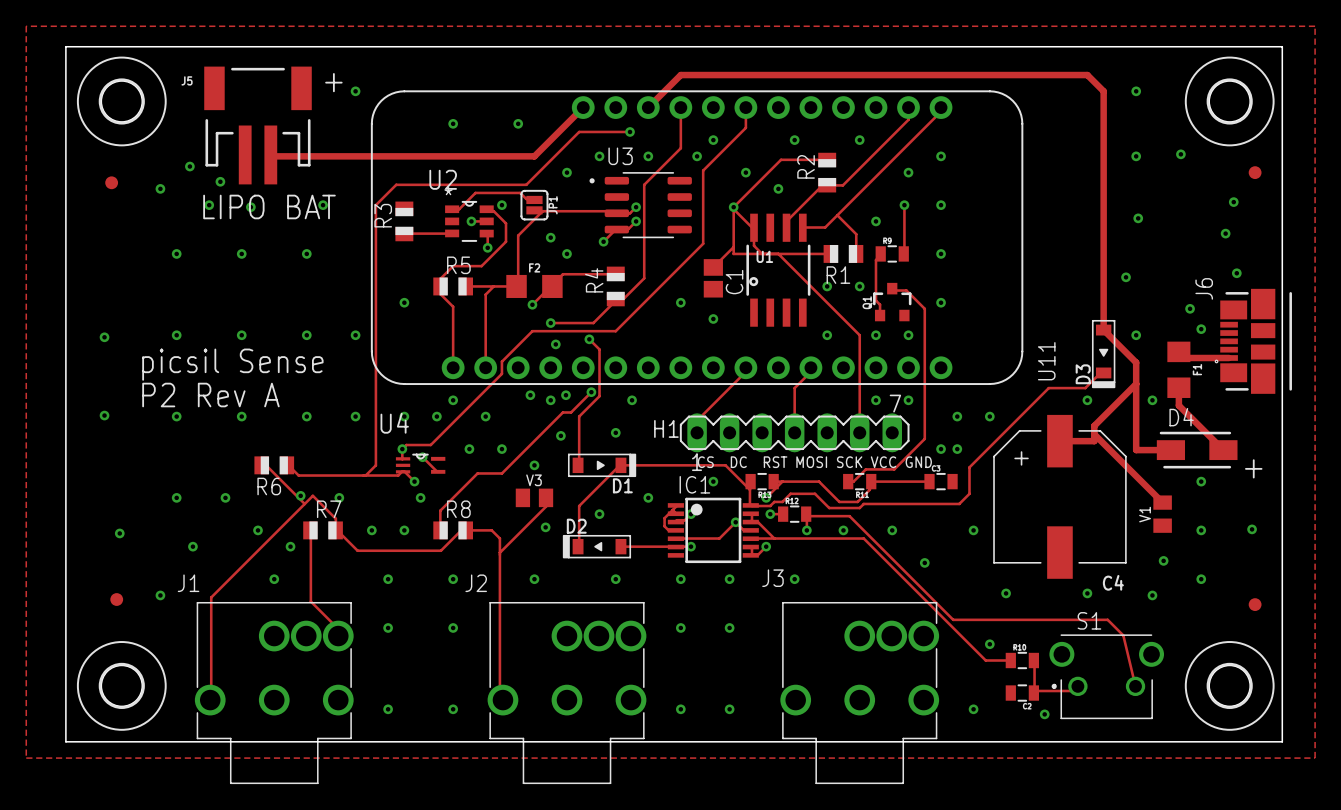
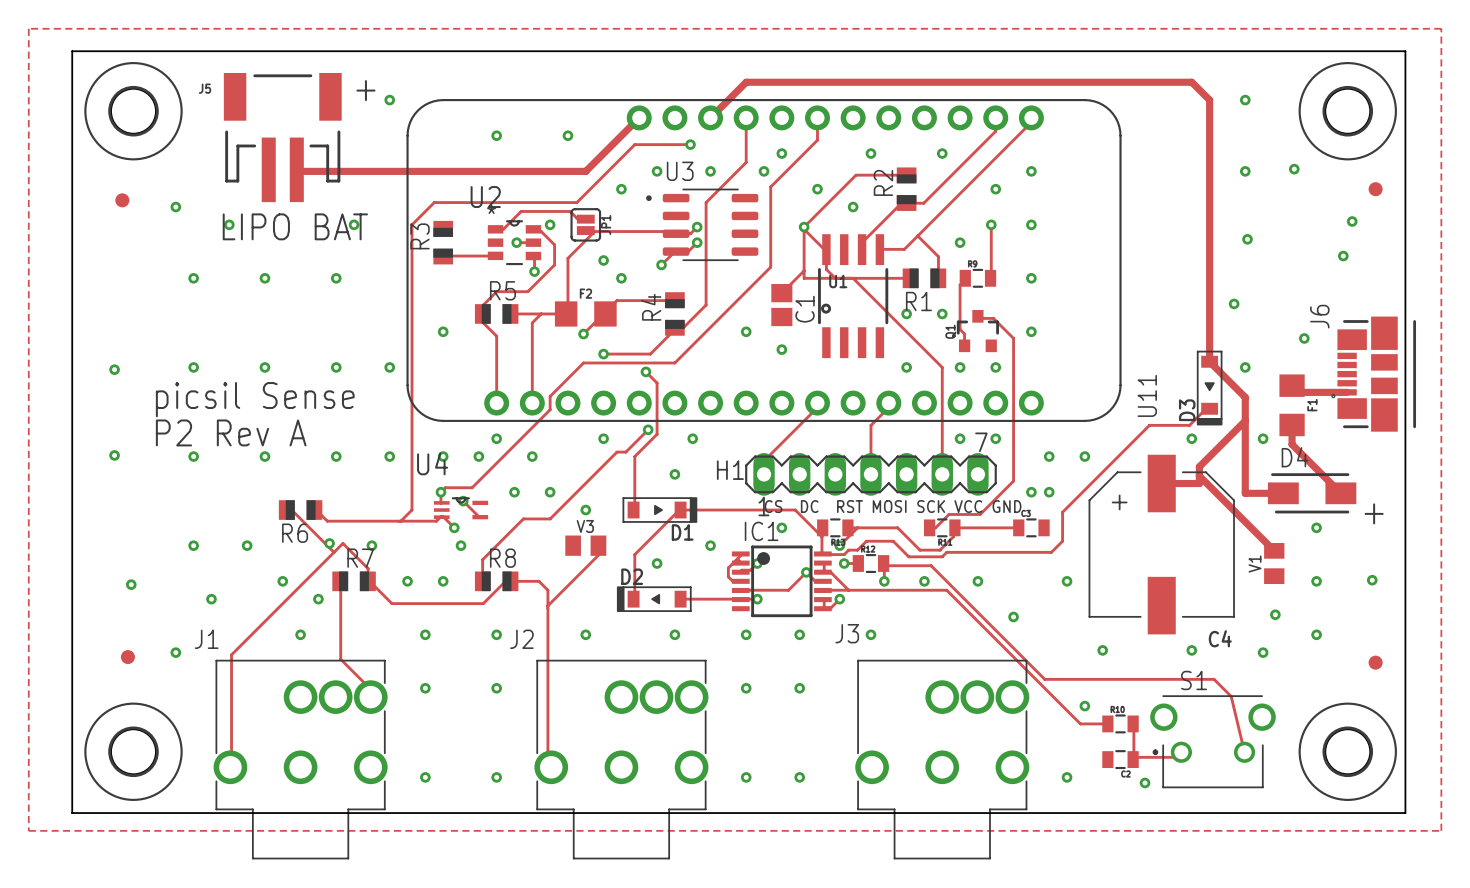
via: (189, 166) -> none
via: (220, 181) -> none
via: (250, 207) -> none
via: (1236, 273) -> none
via: (1201, 329) -> none
via: (555, 344) -> none
via: (530, 395) -> none
via: (565, 395) -> none
via: (560, 435) -> none
via: (545, 527) -> none

